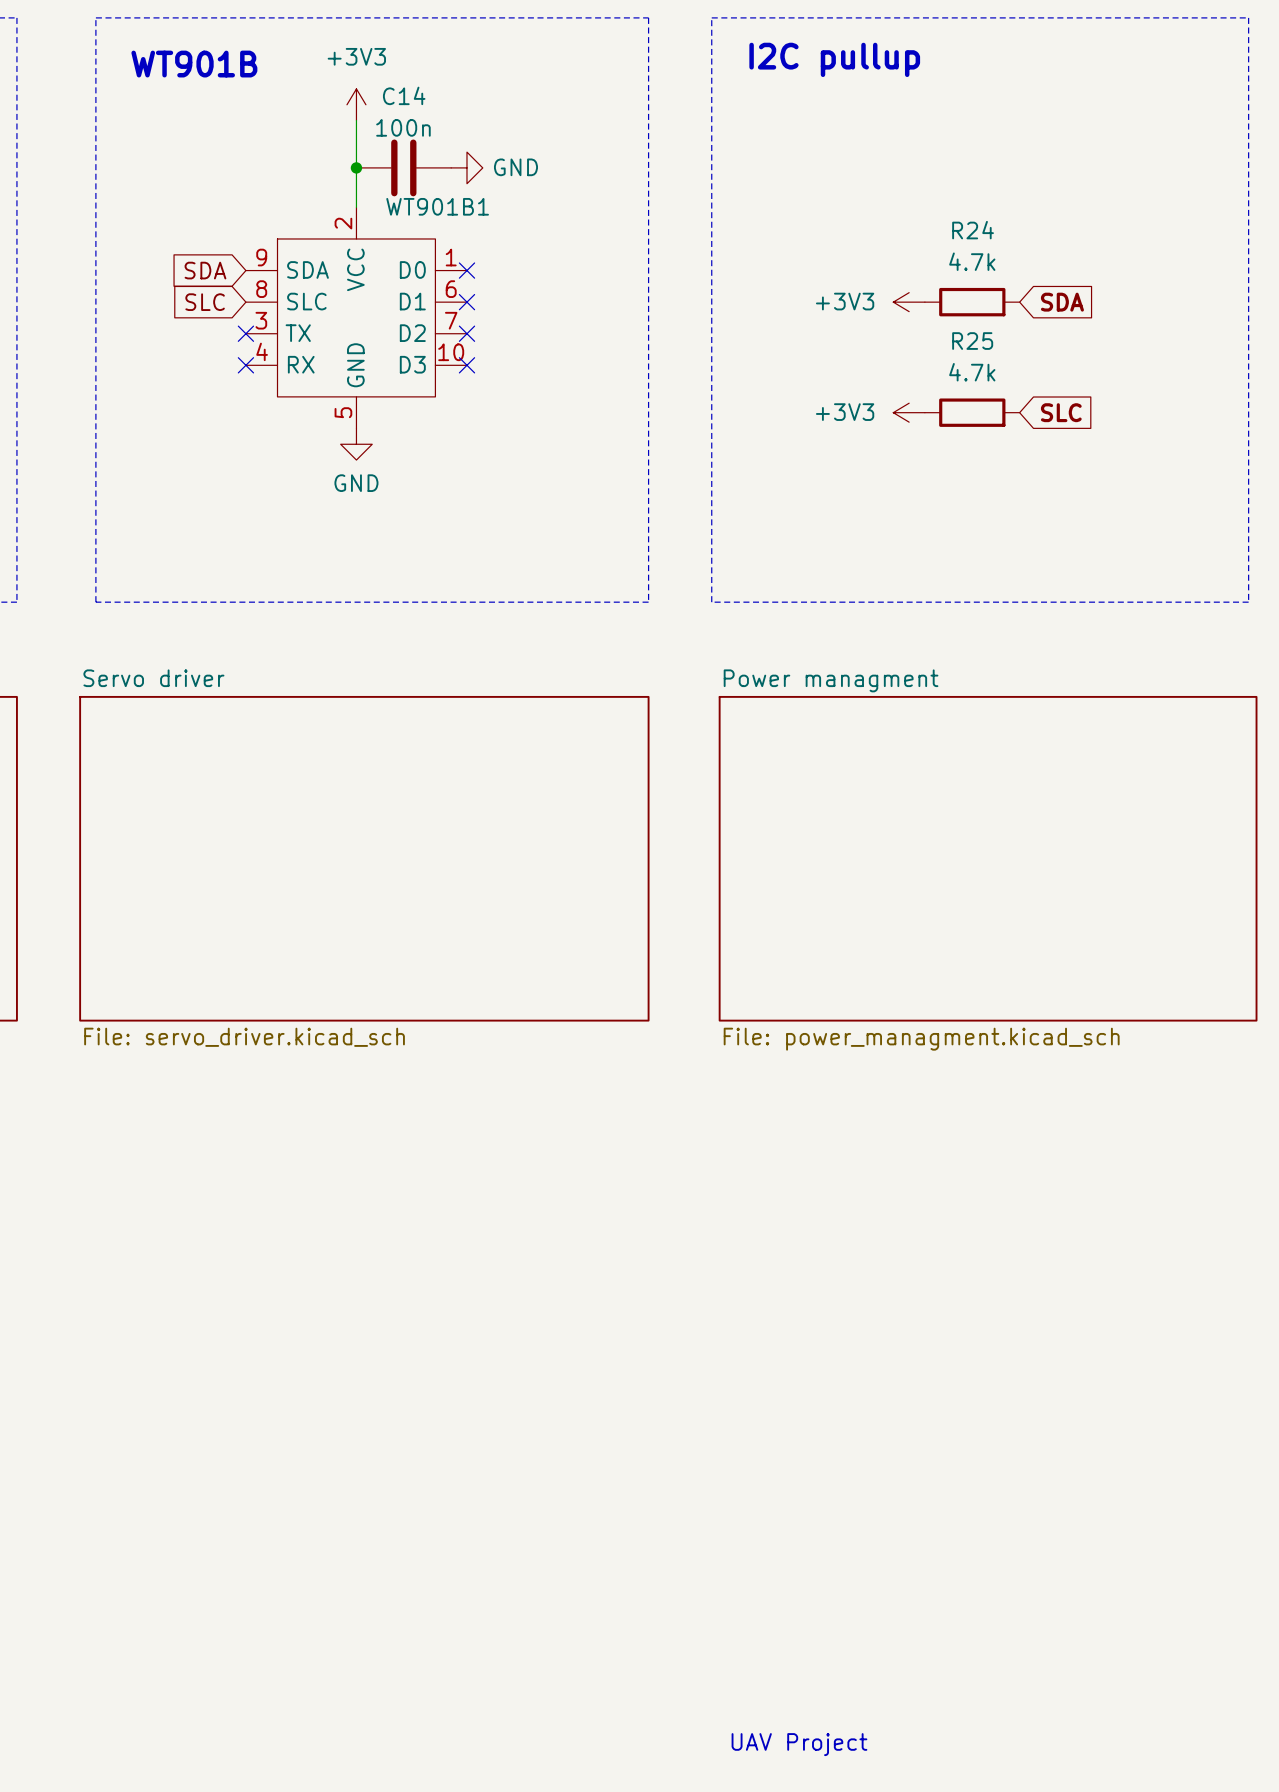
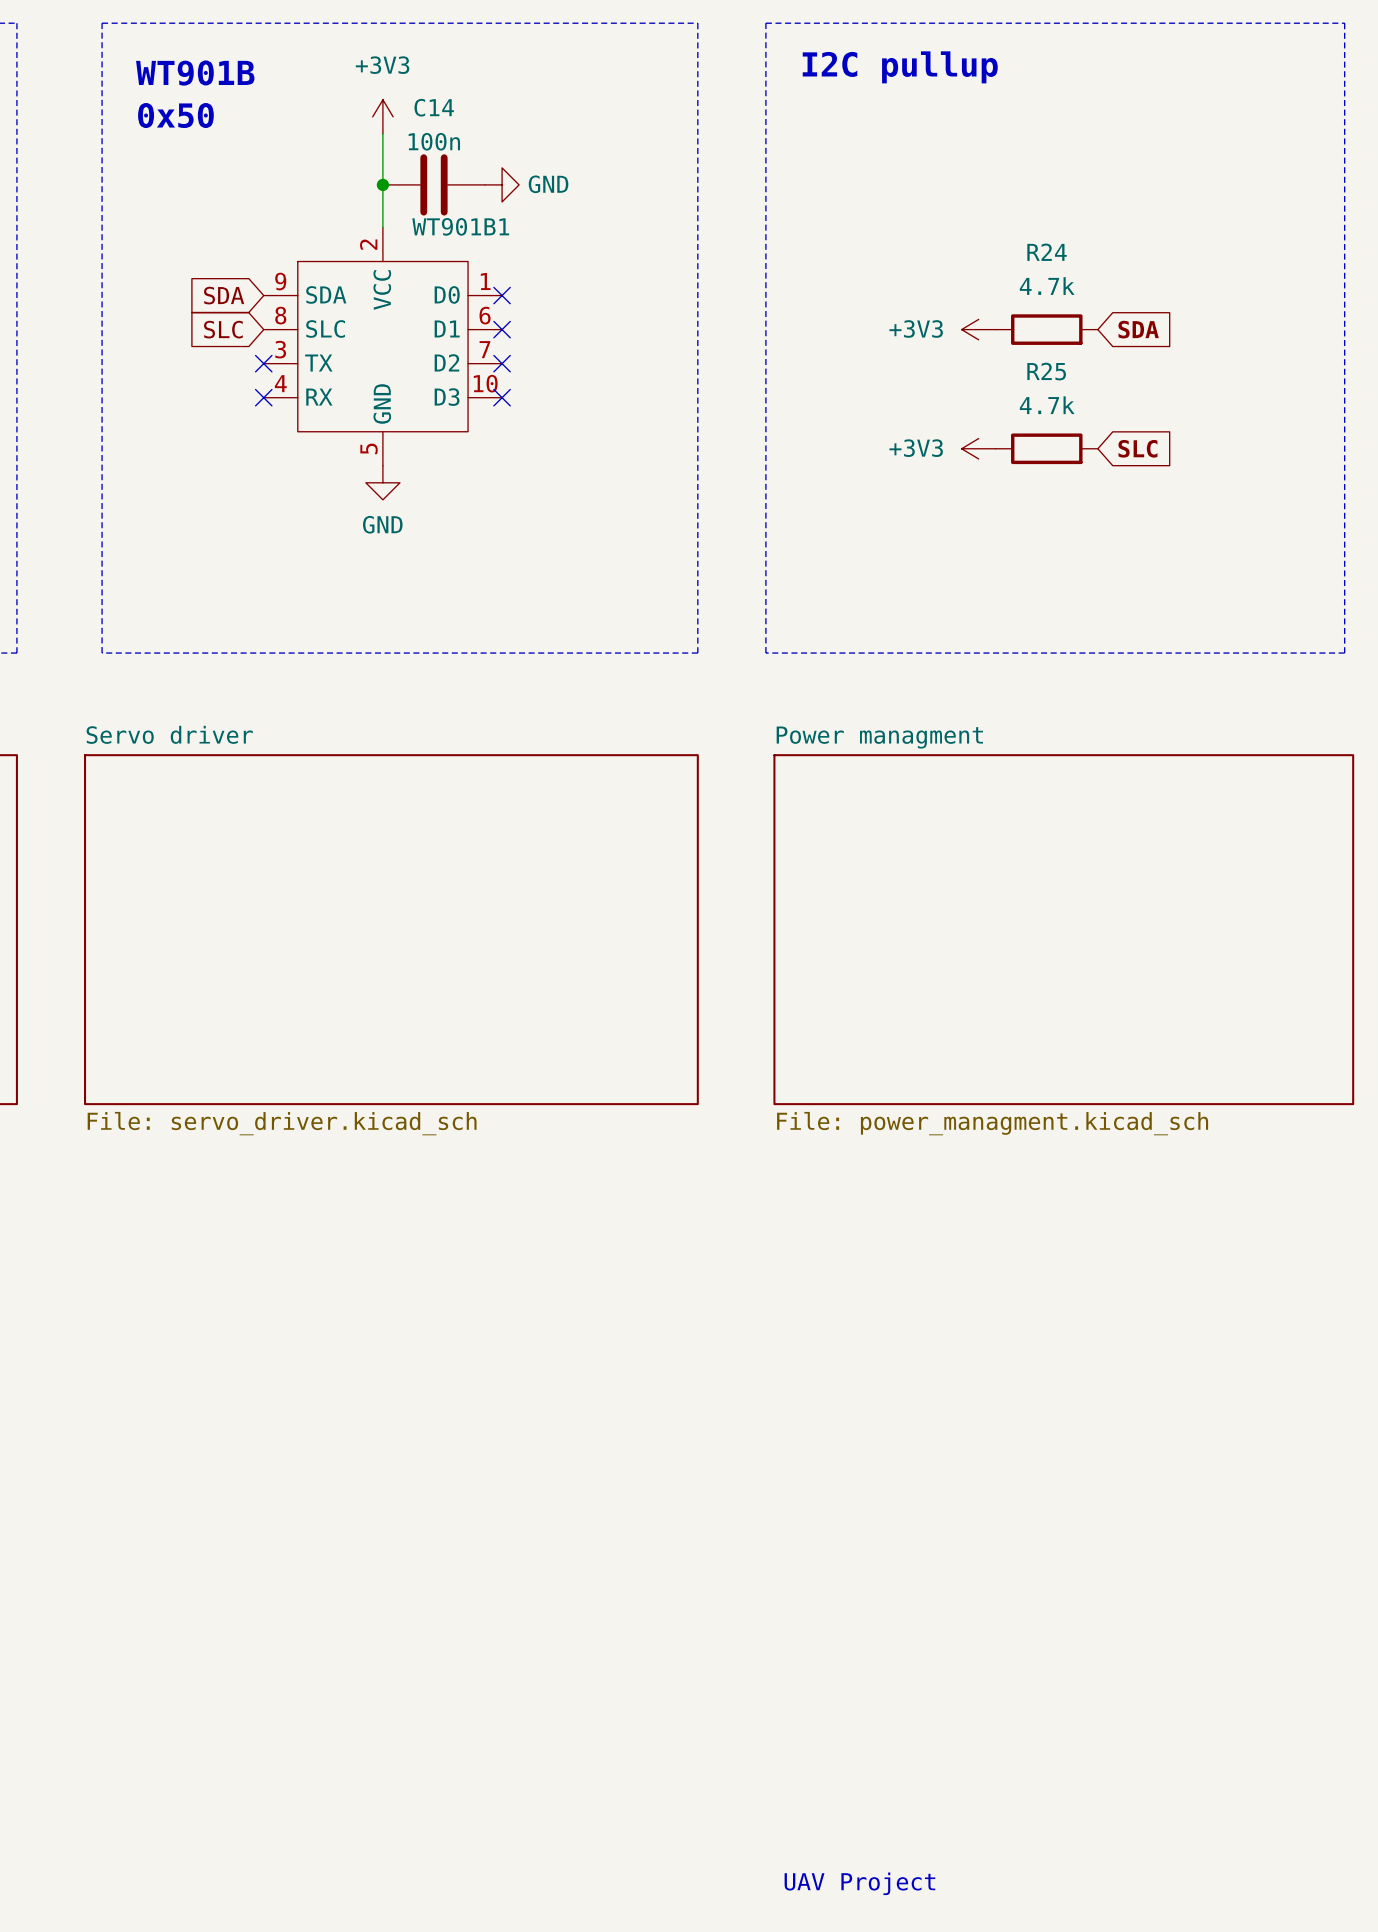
text: none -> 0x50 (175, 115)

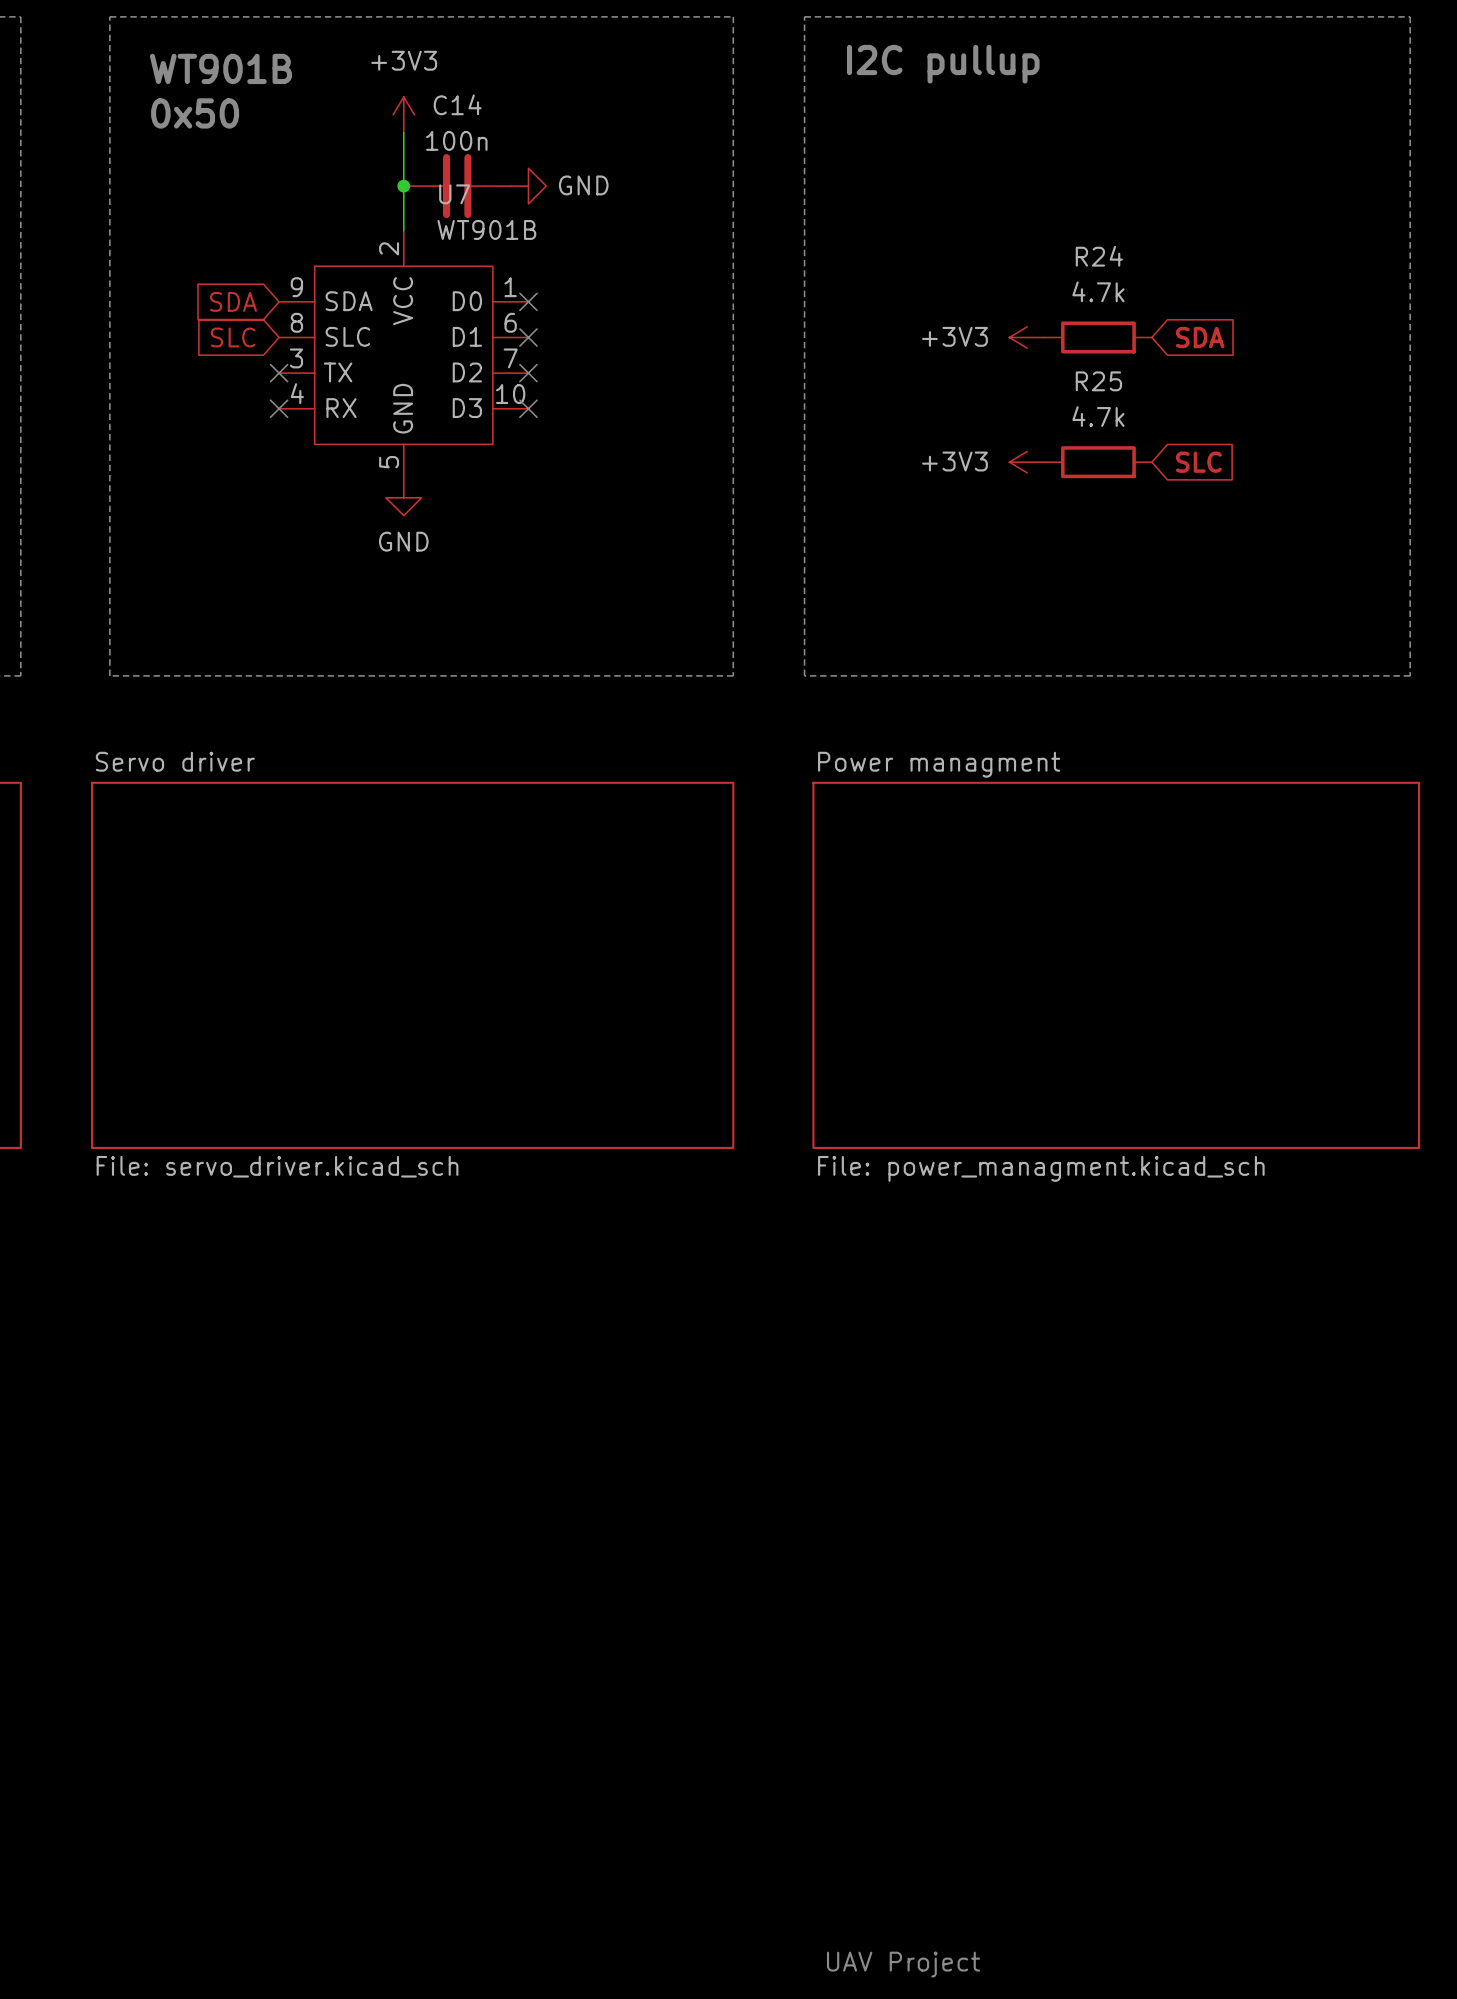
WT901B1 name: WT901B1 (460, 226) -> U7 (454, 194)

